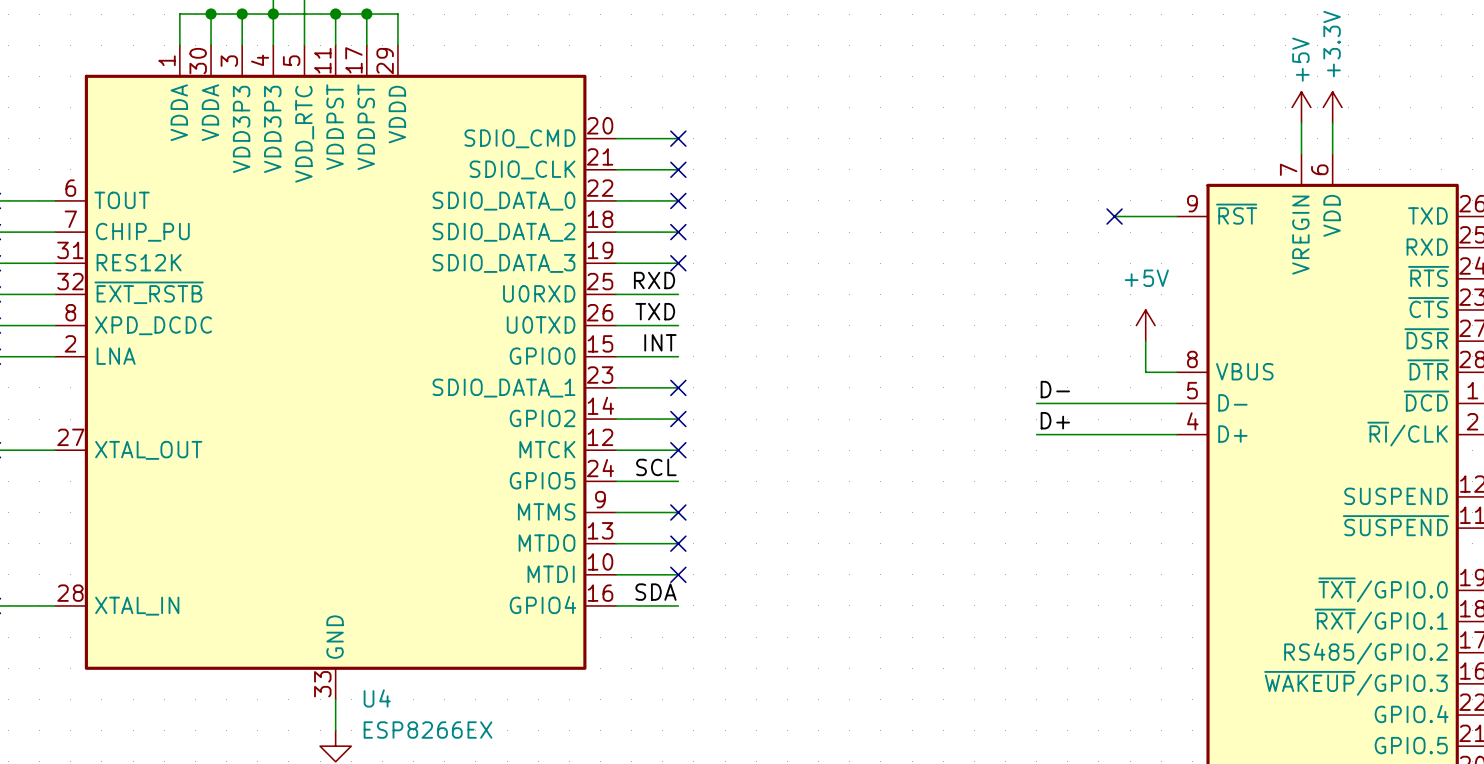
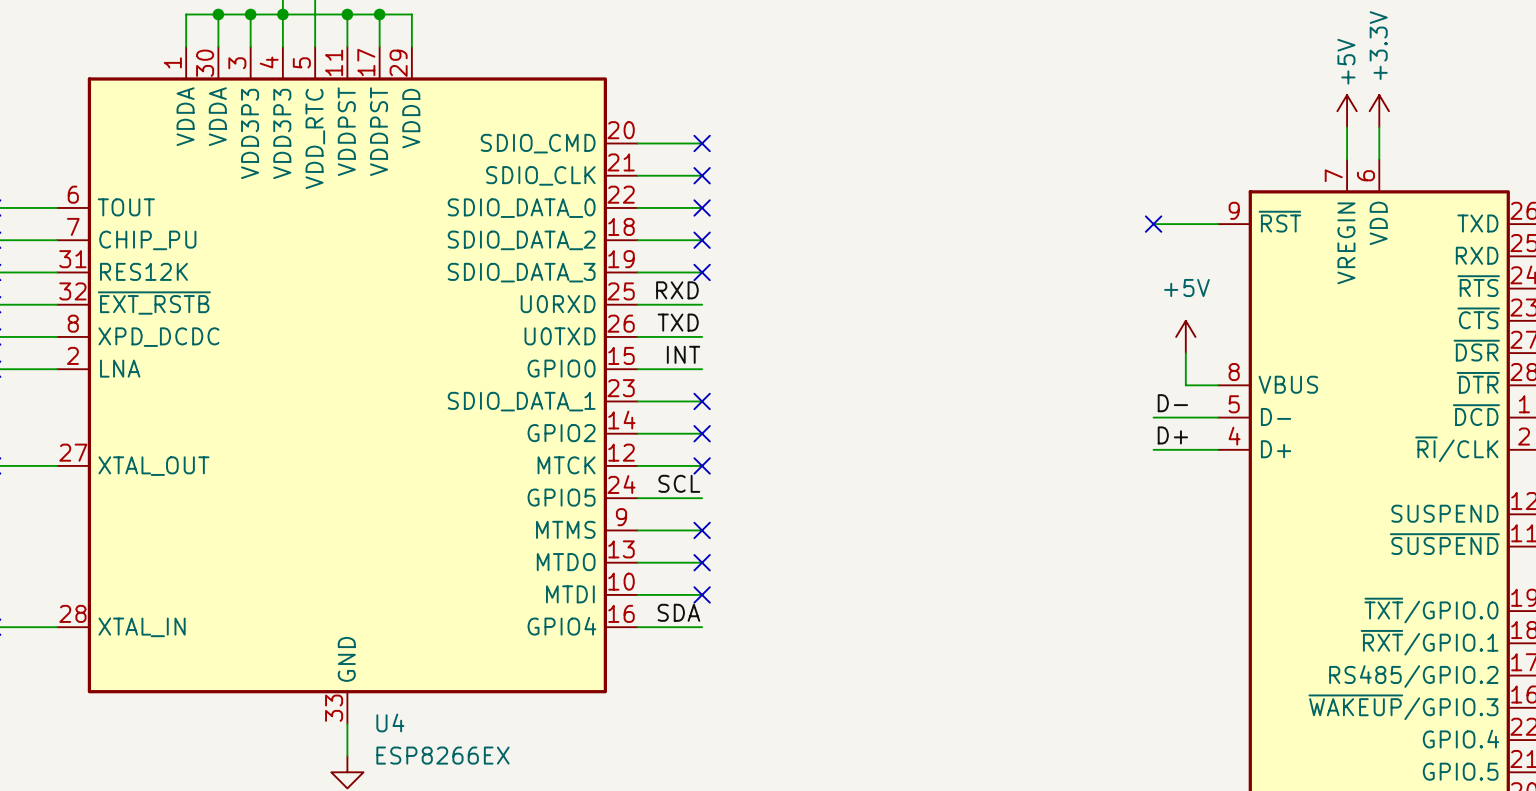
label position: D- (1055, 389) -> D- (1172, 403)
wire: (1036, 403) (1114, 403) -> none
label position: D+ (1055, 420) -> D+ (1172, 435)
wire: (1036, 434) (1114, 434) -> none

